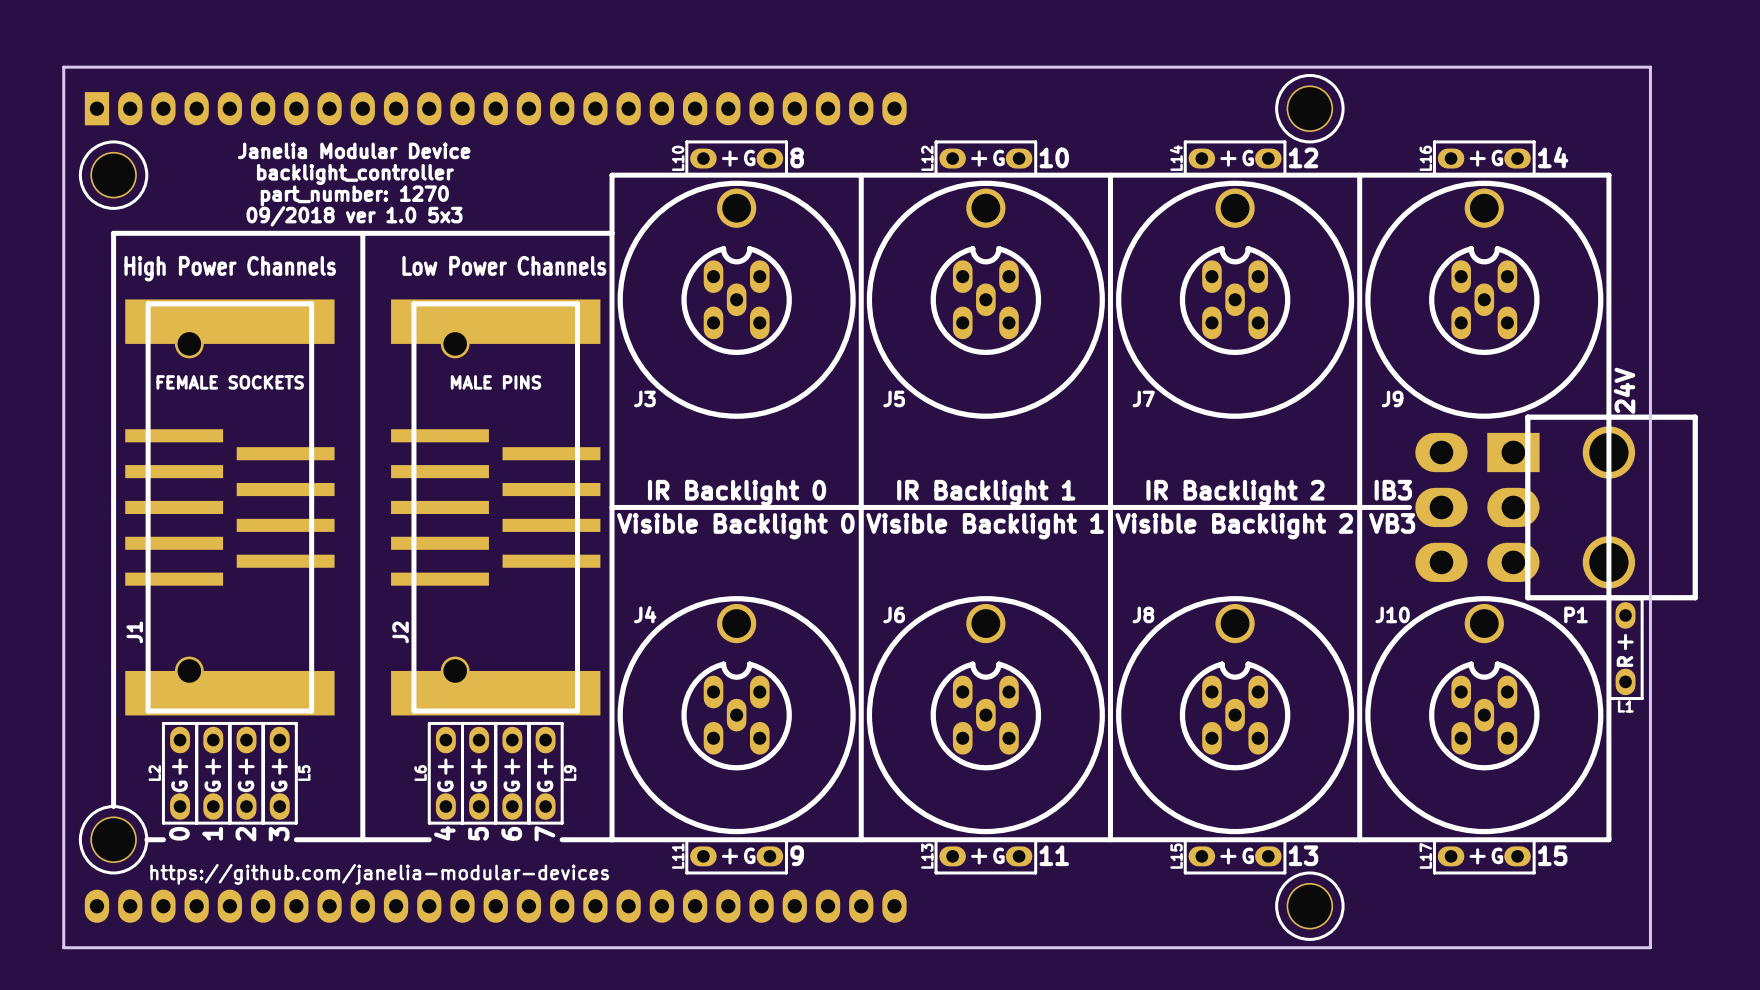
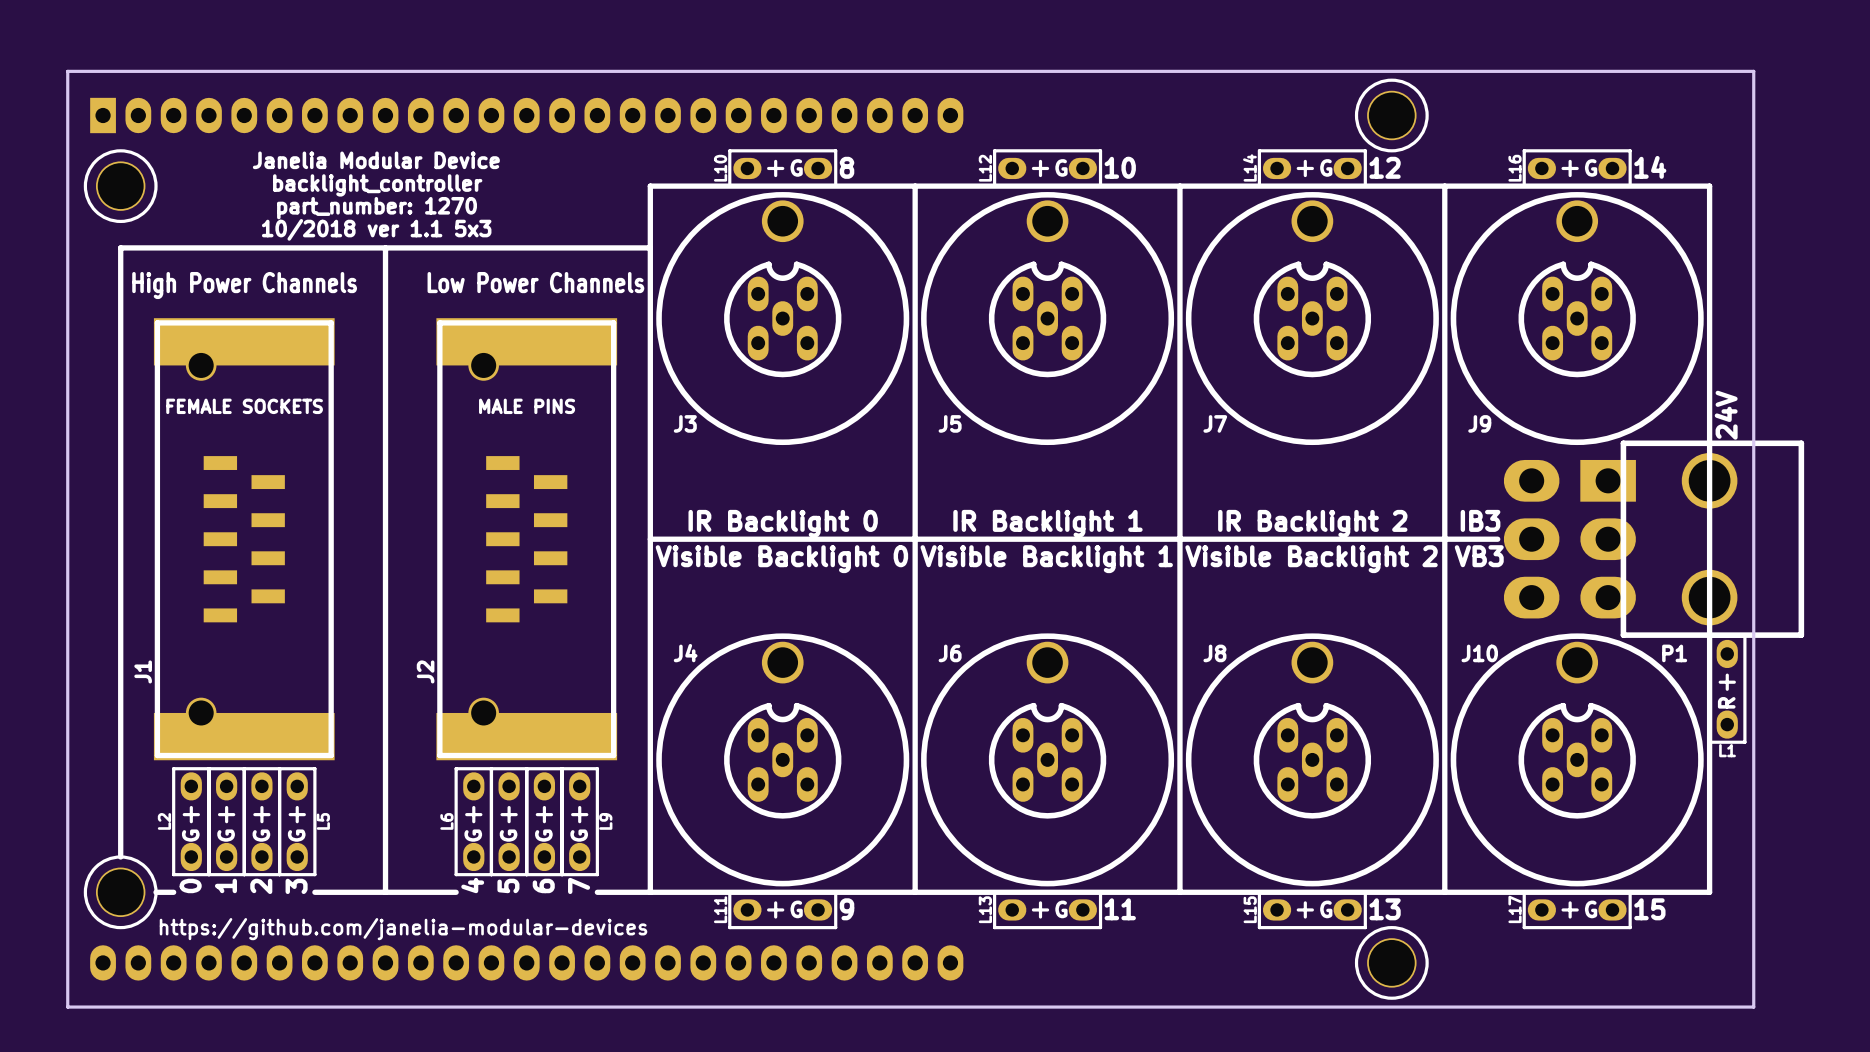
text: 09/2018 ver 1.0 5x3 (354, 216) -> 10/2018 ver 1.1 5x3 (376, 229)
J1 footprint: [125, 299, 335, 716] -> [153, 318, 335, 761]
J2 footprint: [391, 299, 601, 716] -> [436, 318, 618, 761]

